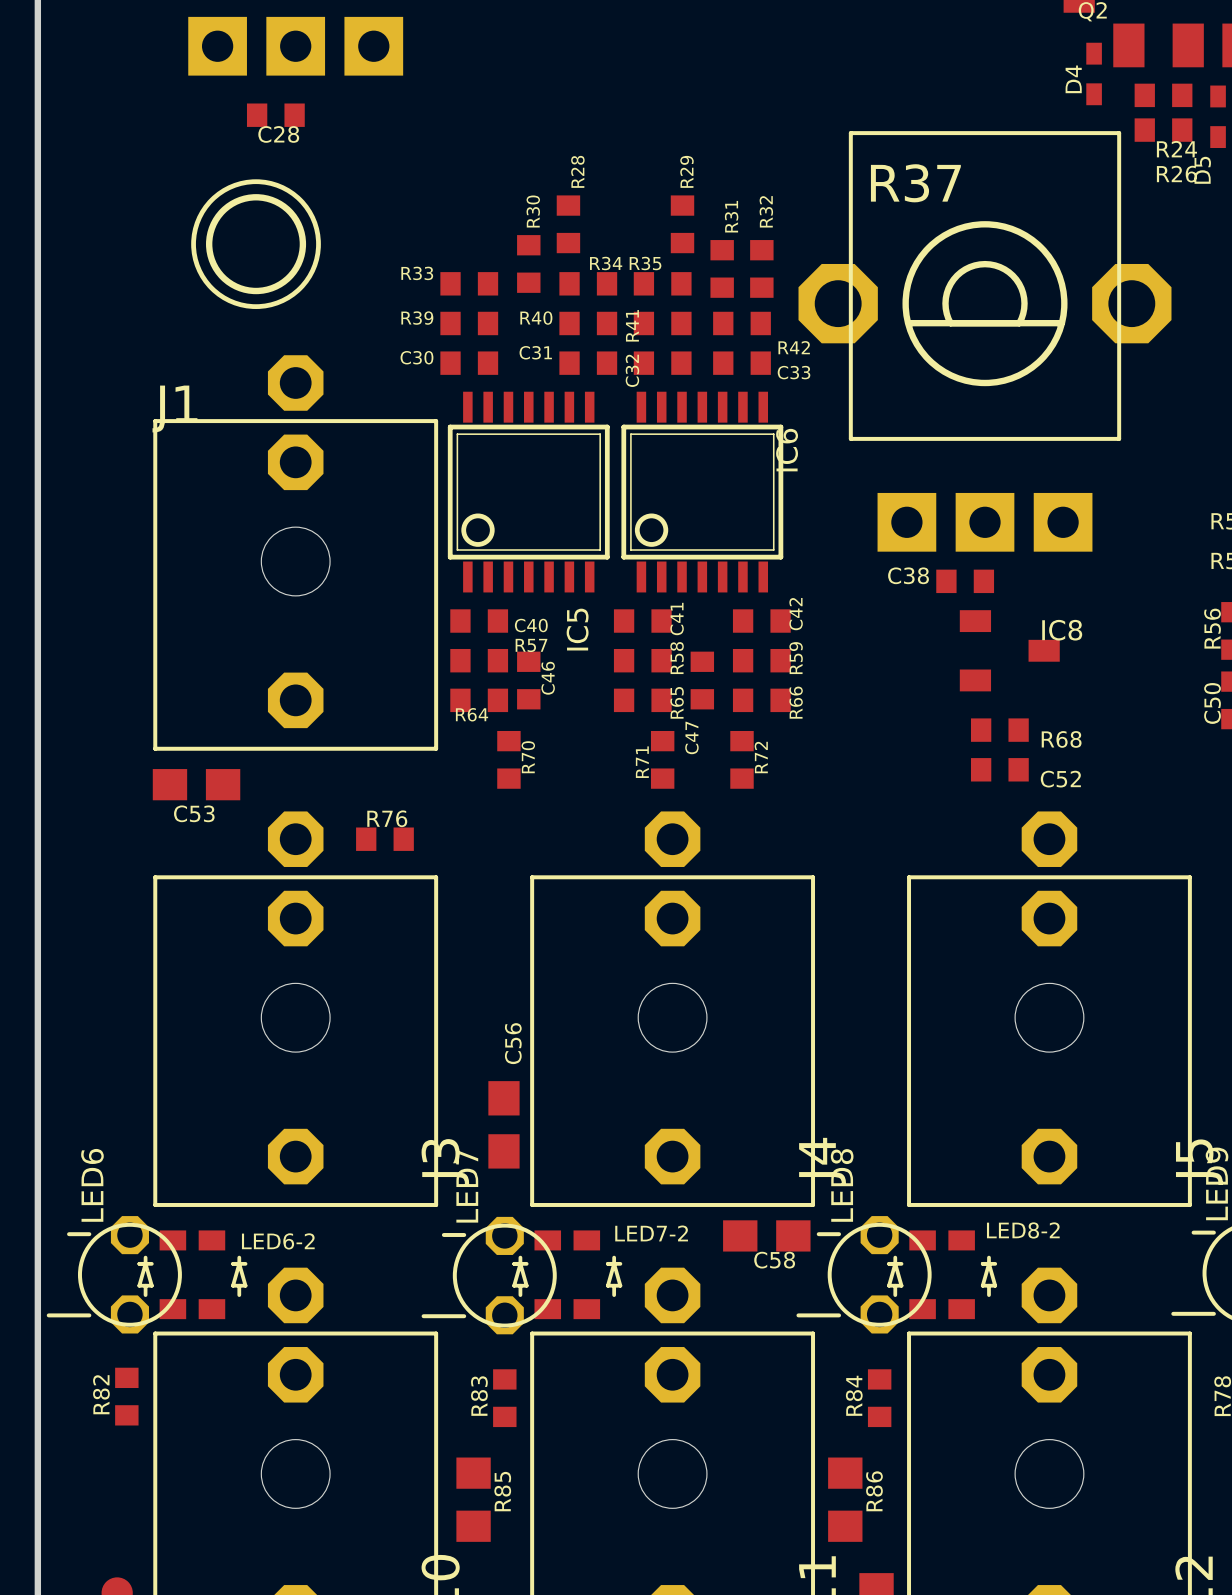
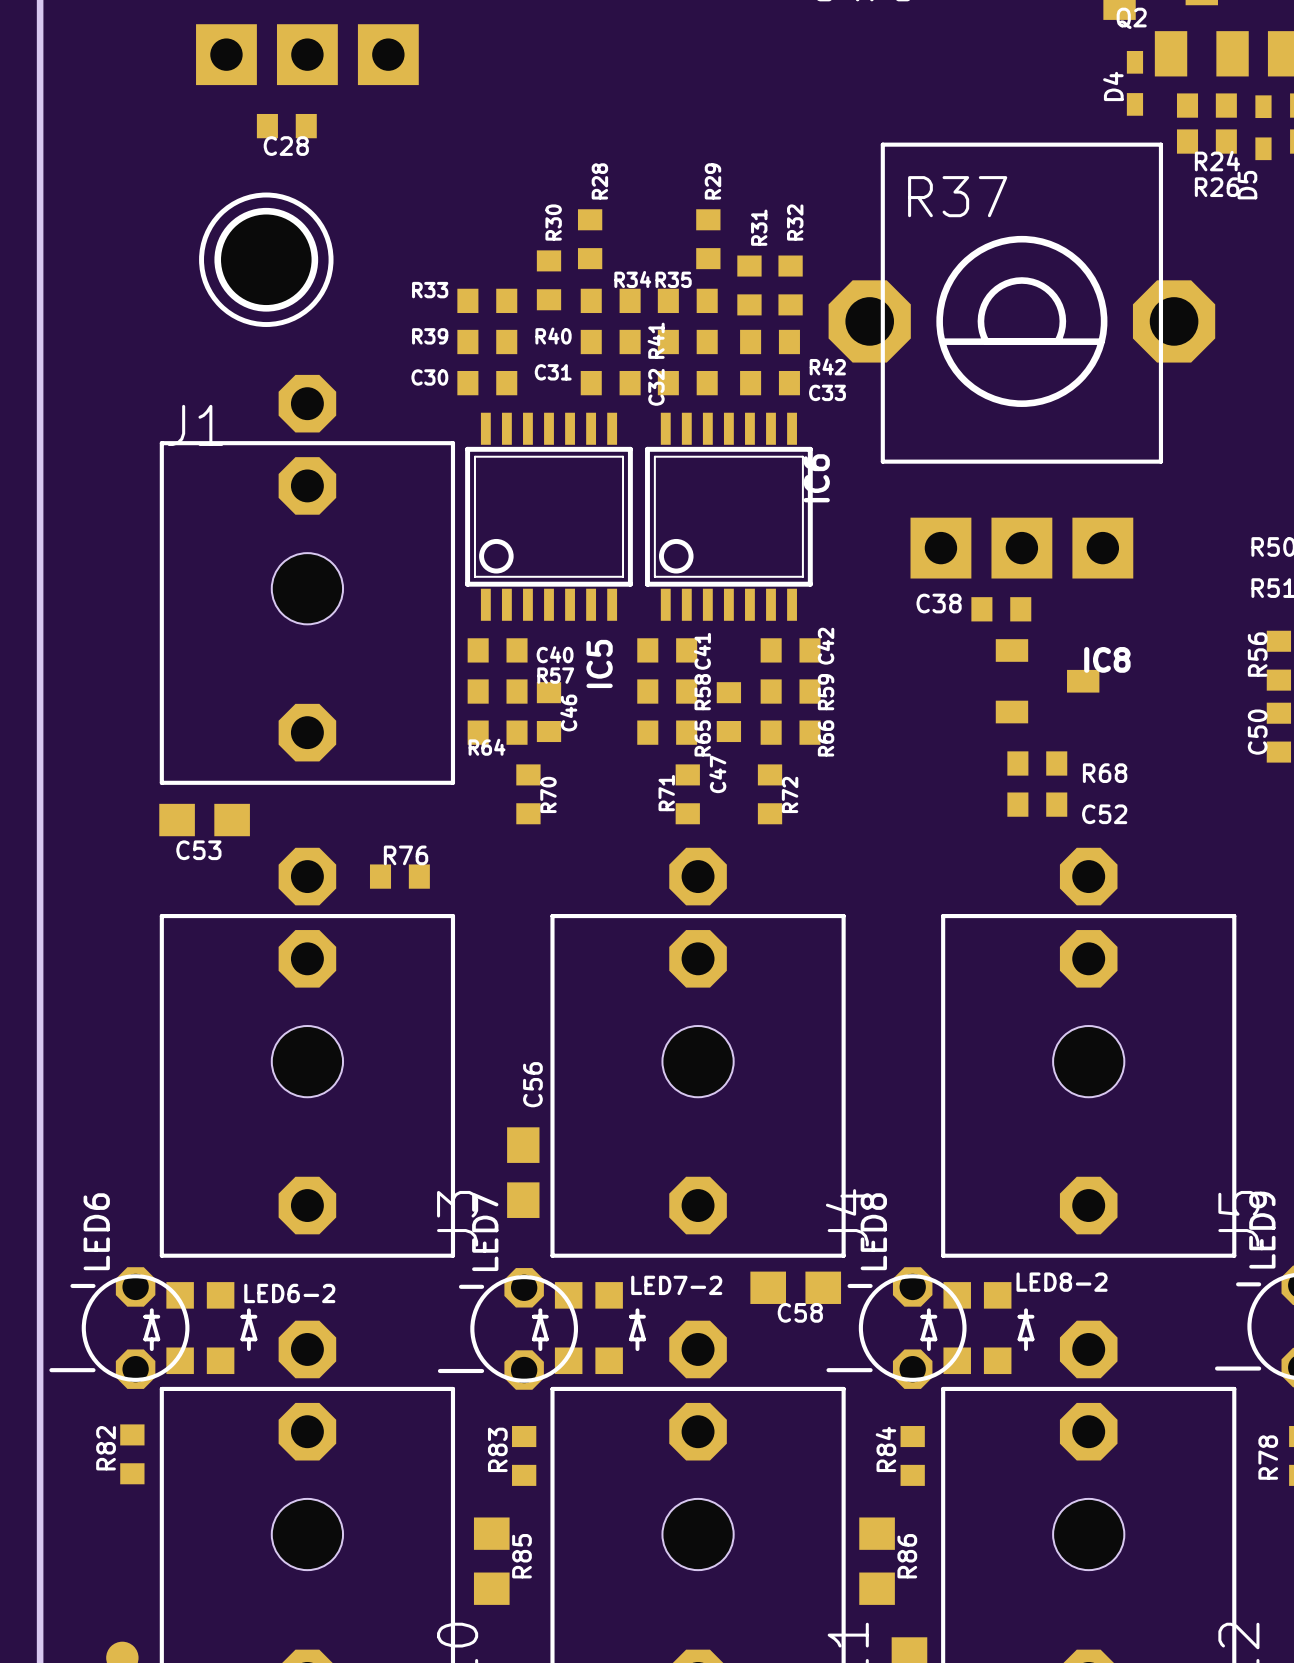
LED6-2 footprint: [137, 1230, 248, 1320] -> [143, 1282, 258, 1375]
LED7-2 footprint: [512, 1230, 623, 1320] -> [531, 1282, 646, 1375]
LED8-2 footprint: [887, 1230, 998, 1320] -> [920, 1282, 1035, 1375]

